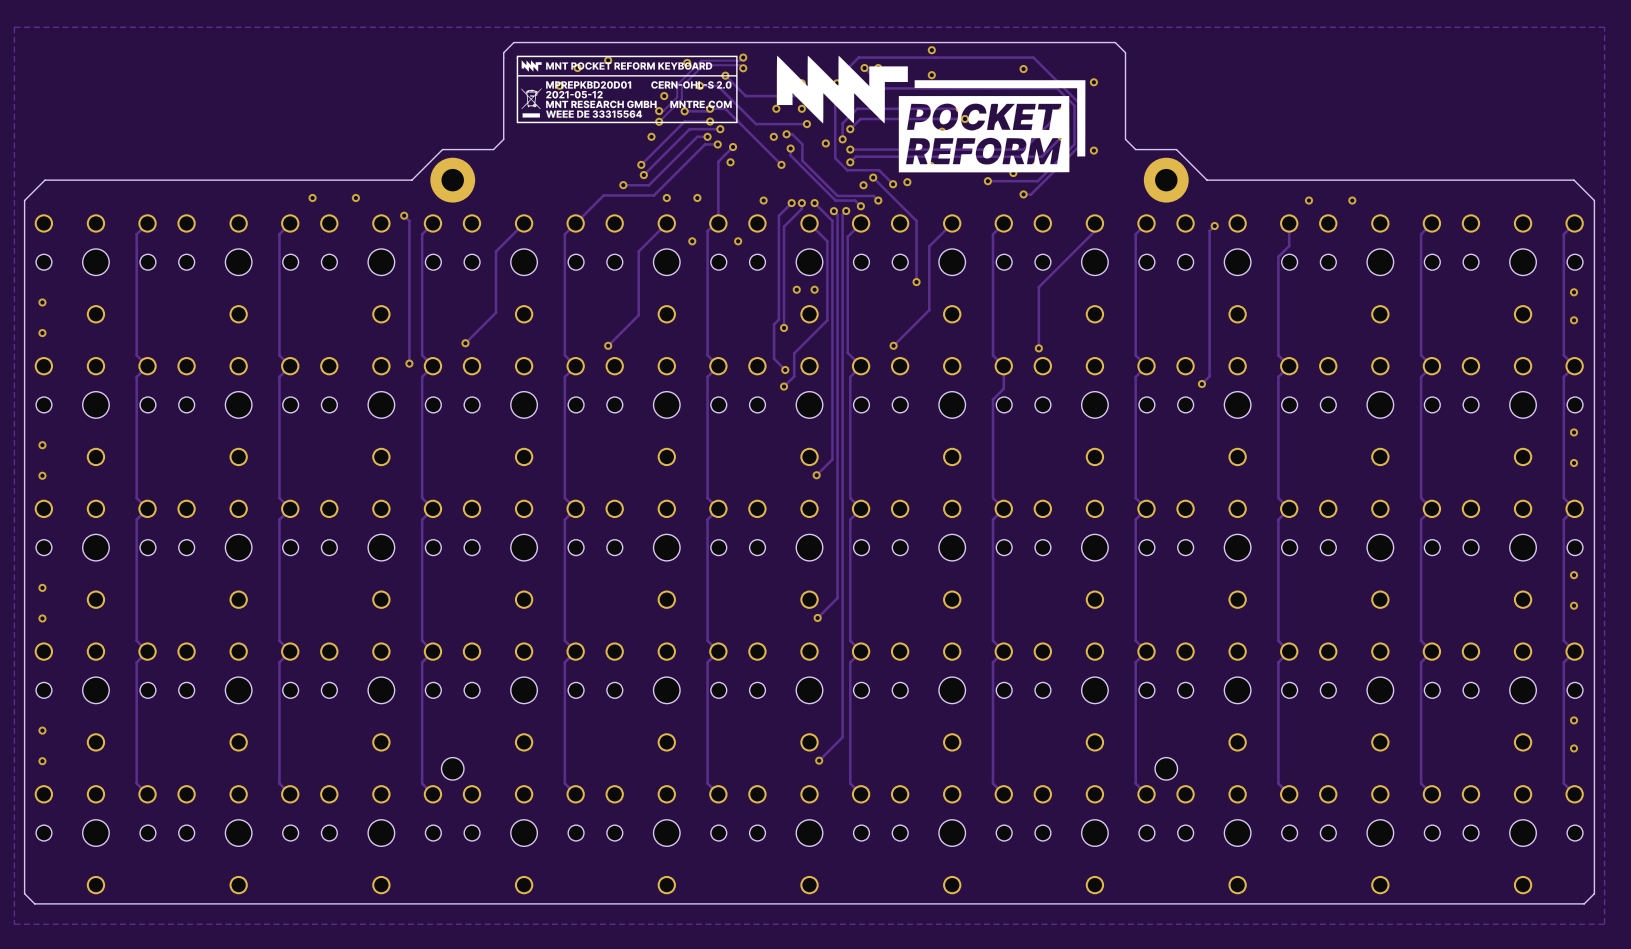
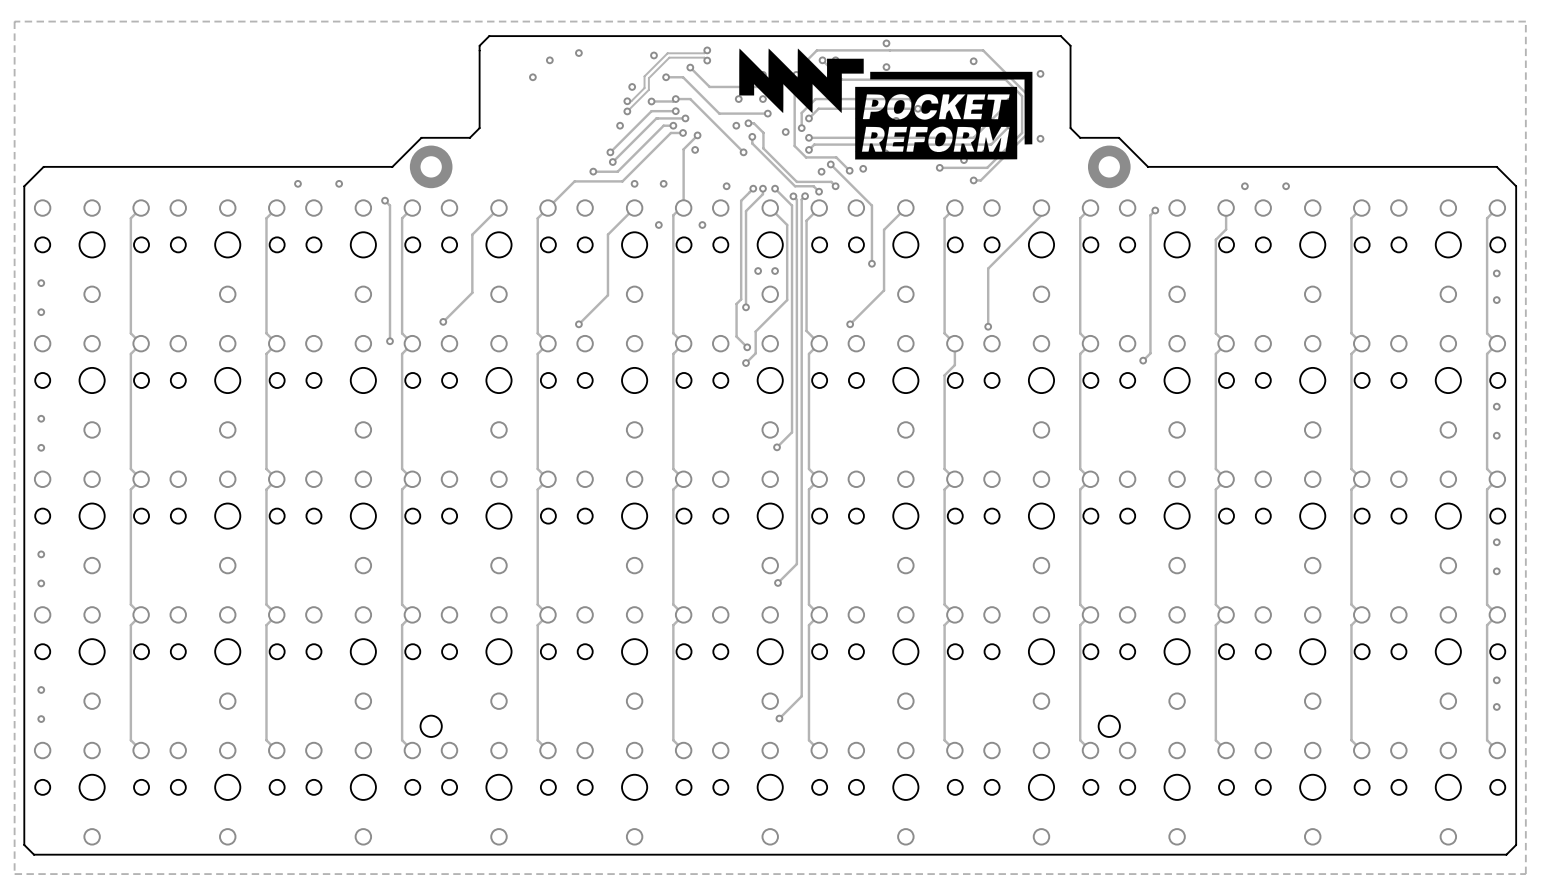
drawing: [516, 55, 738, 124] -> none

